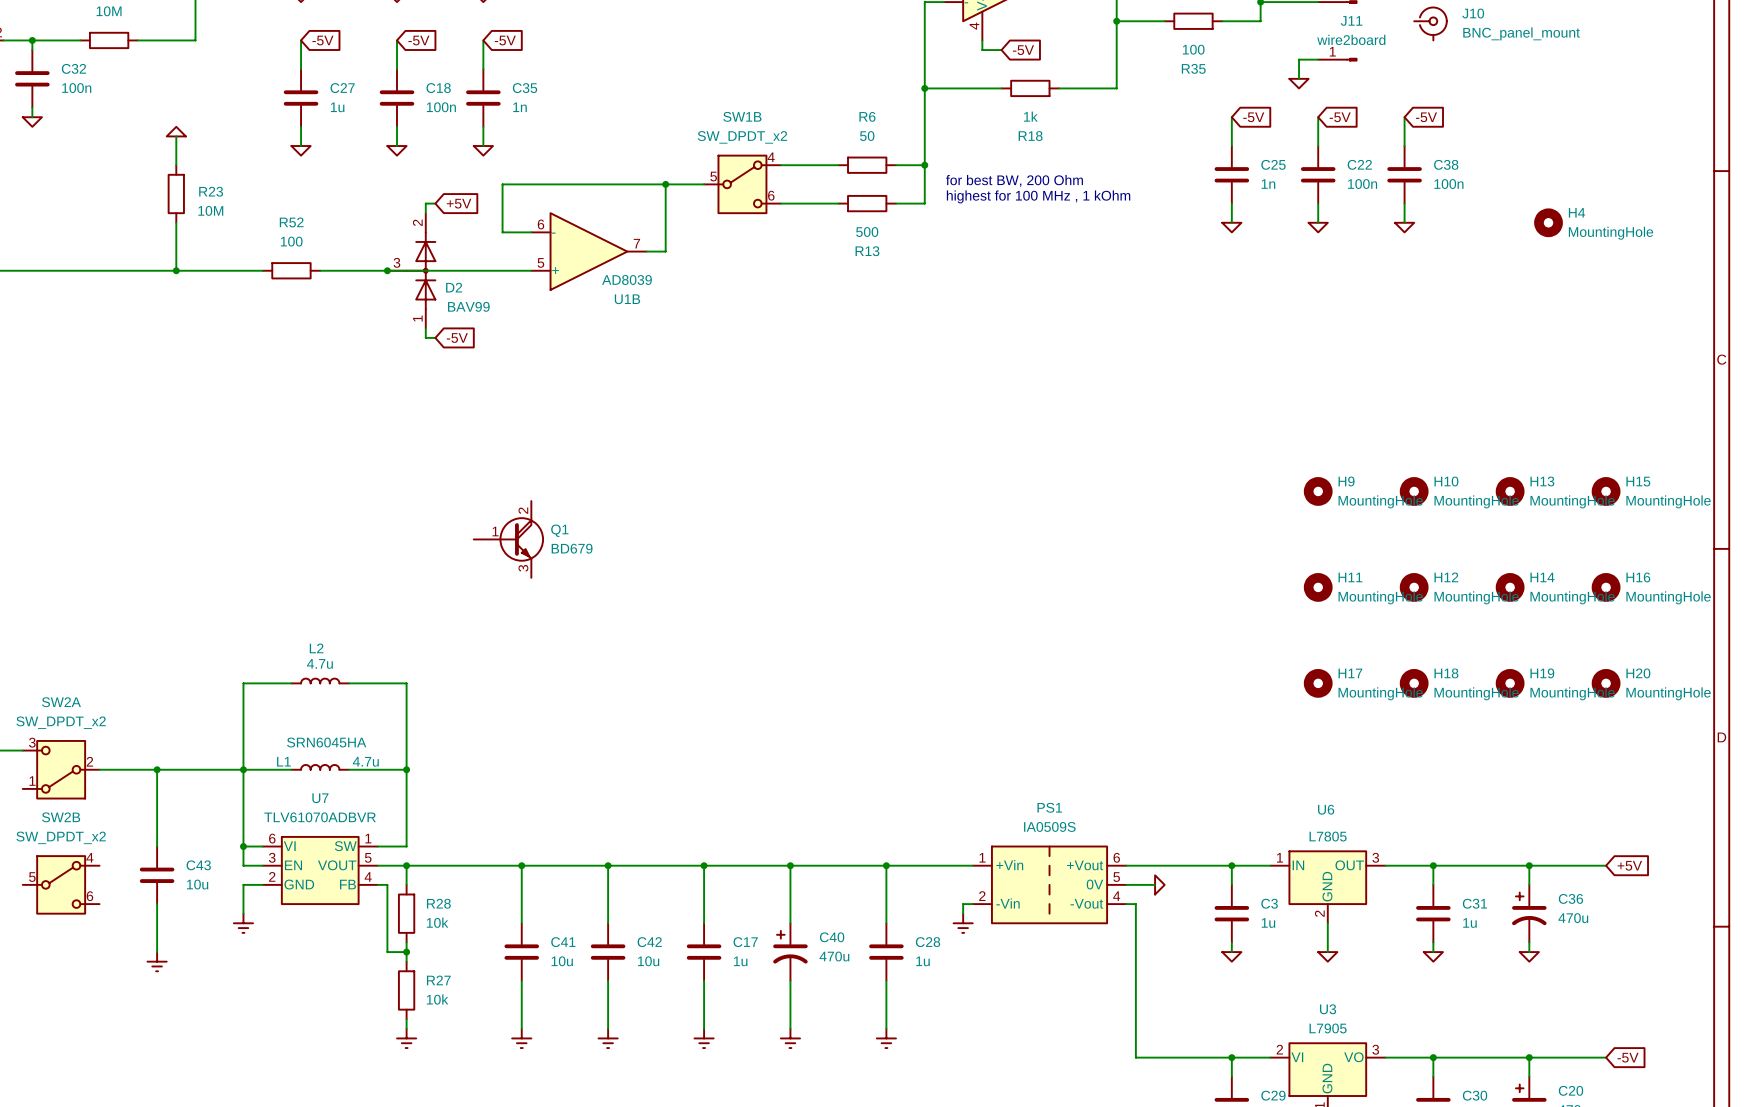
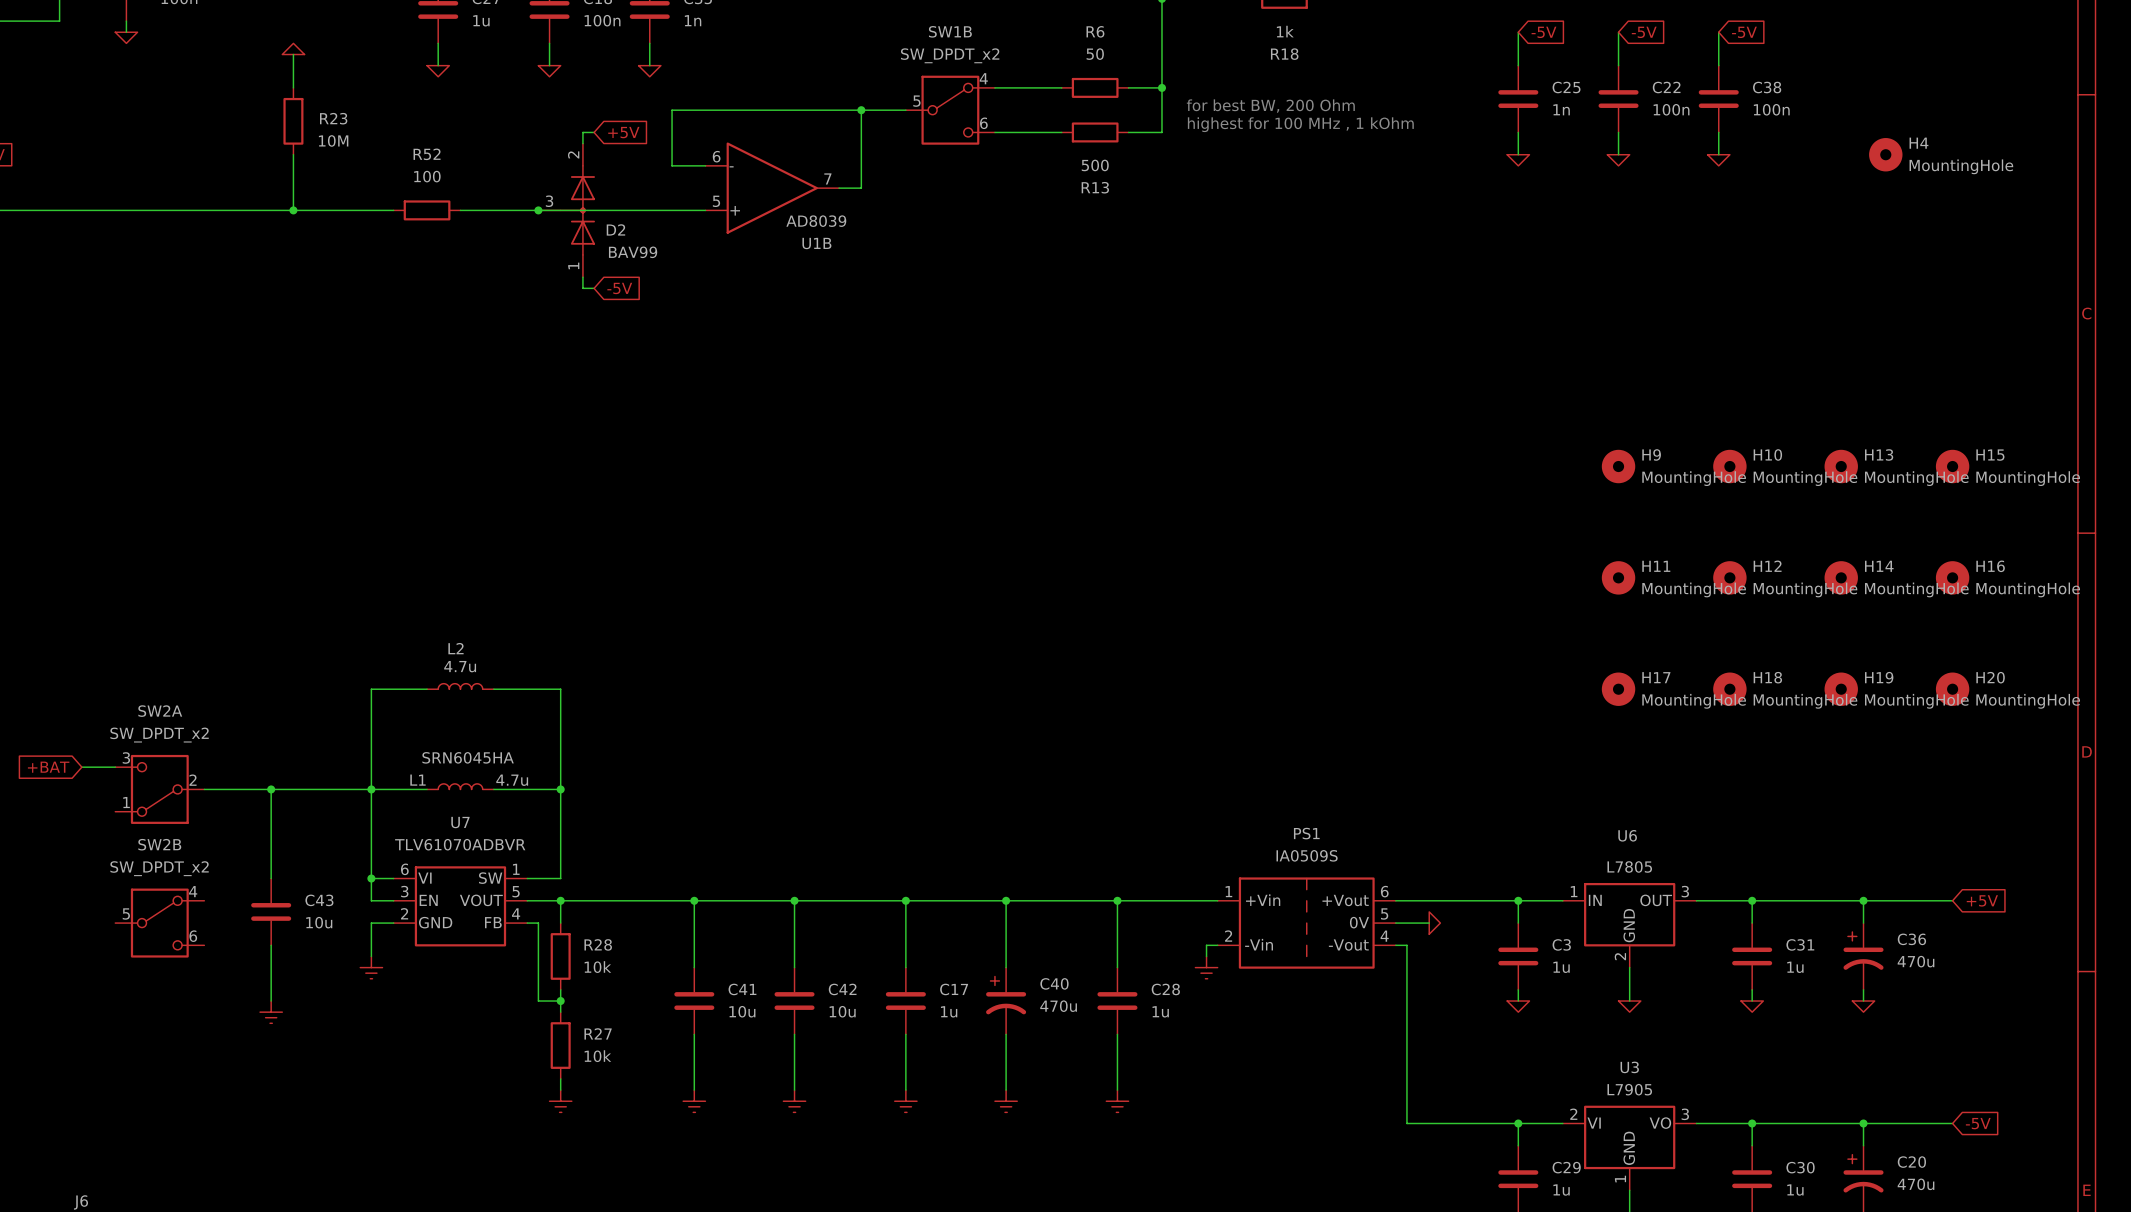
Q1: BD679 (508, 539) -> none

